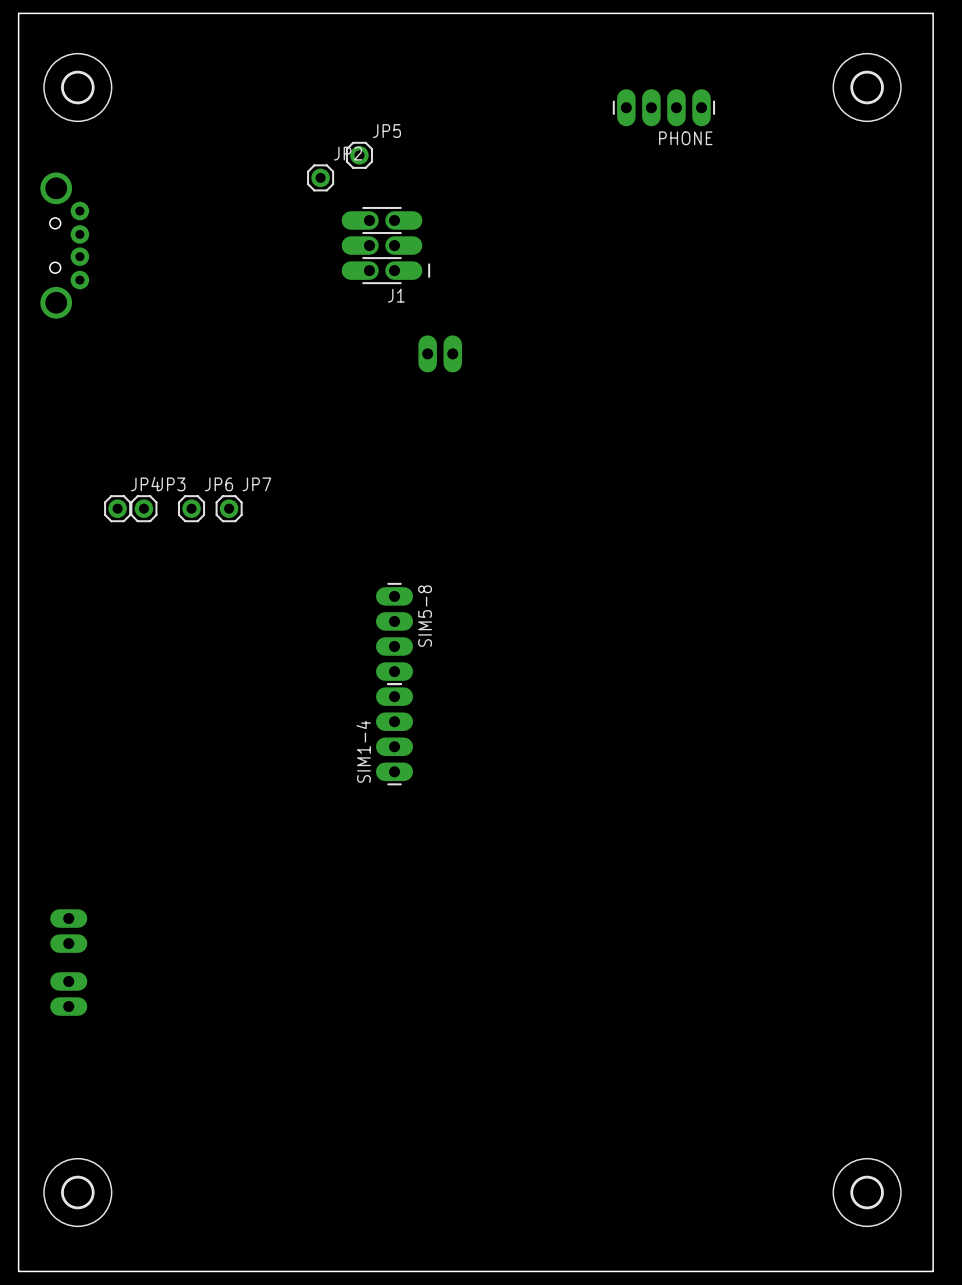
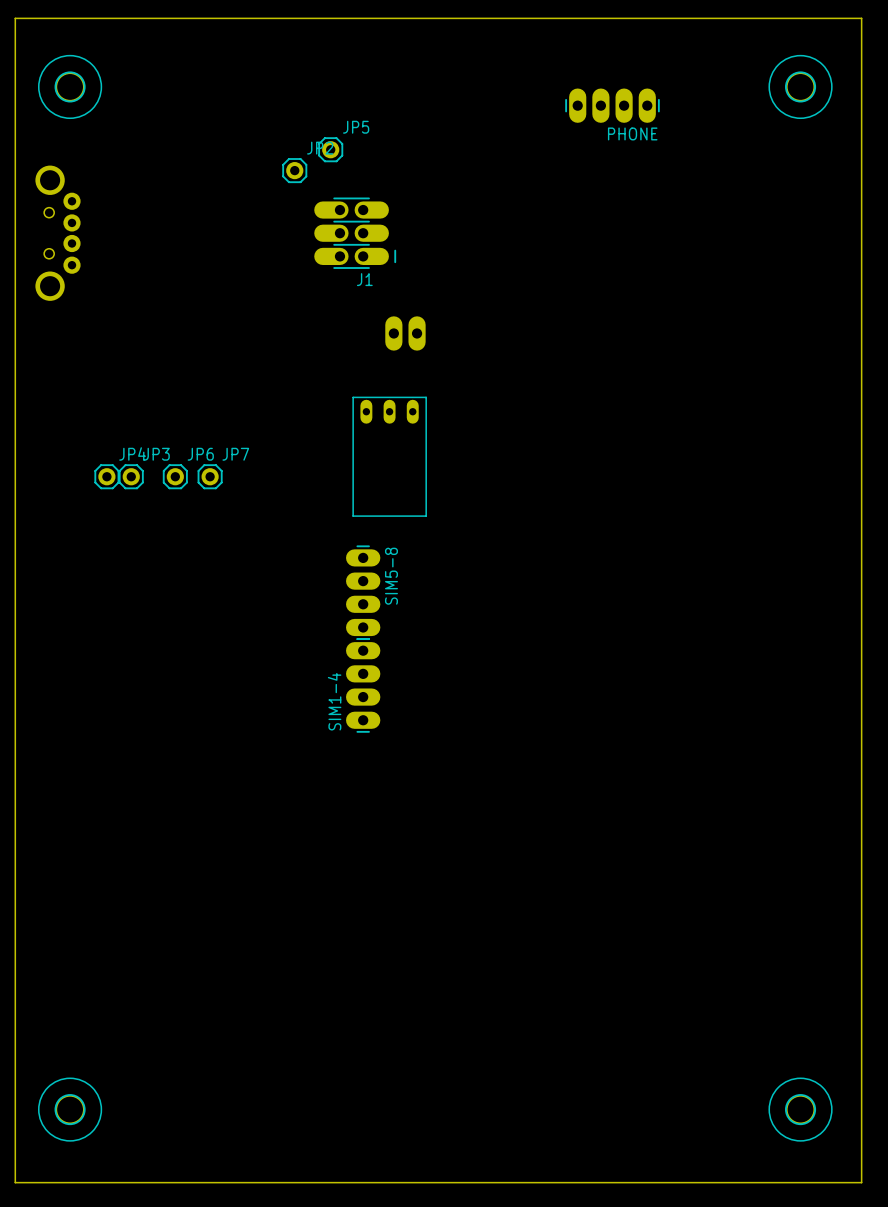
part: none -> (389, 456)
part: (68, 931) -> none
part: (68, 994) -> none

